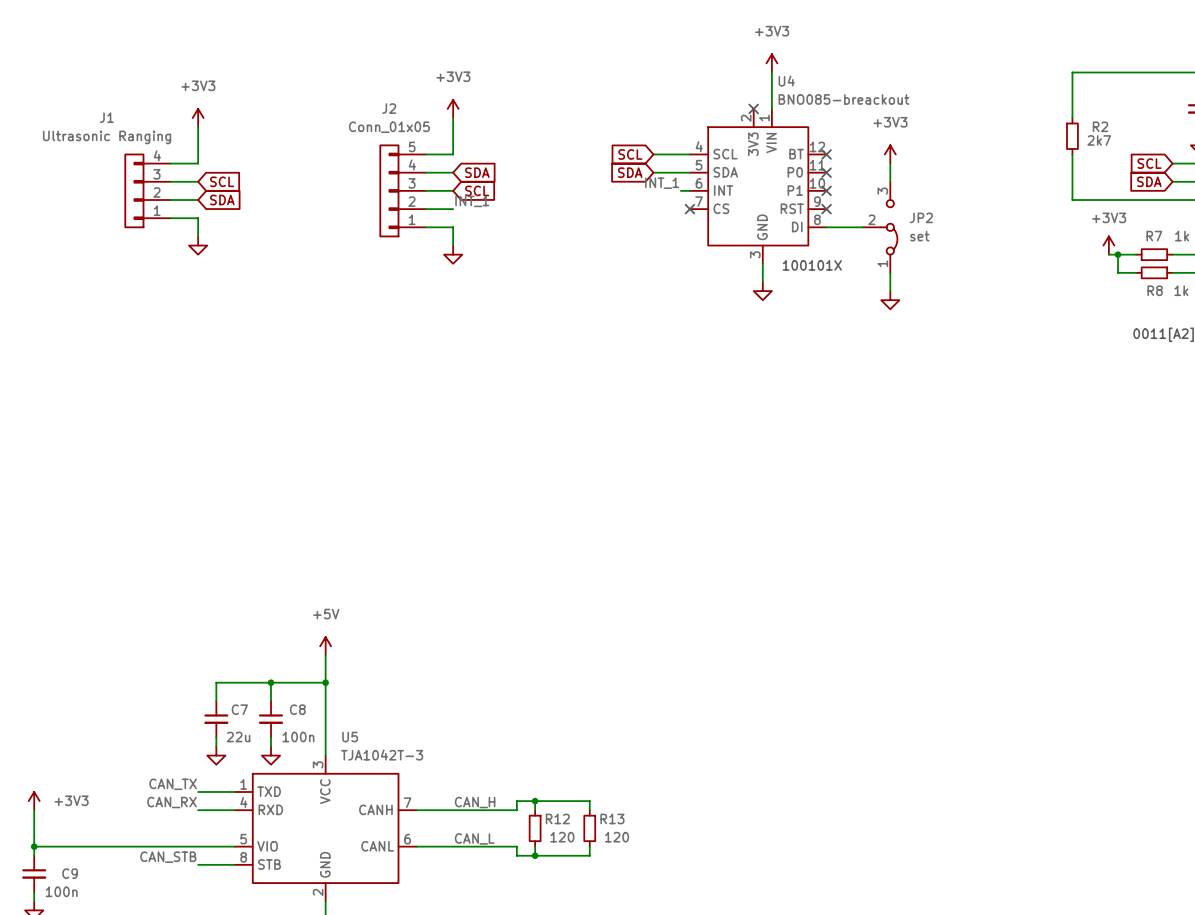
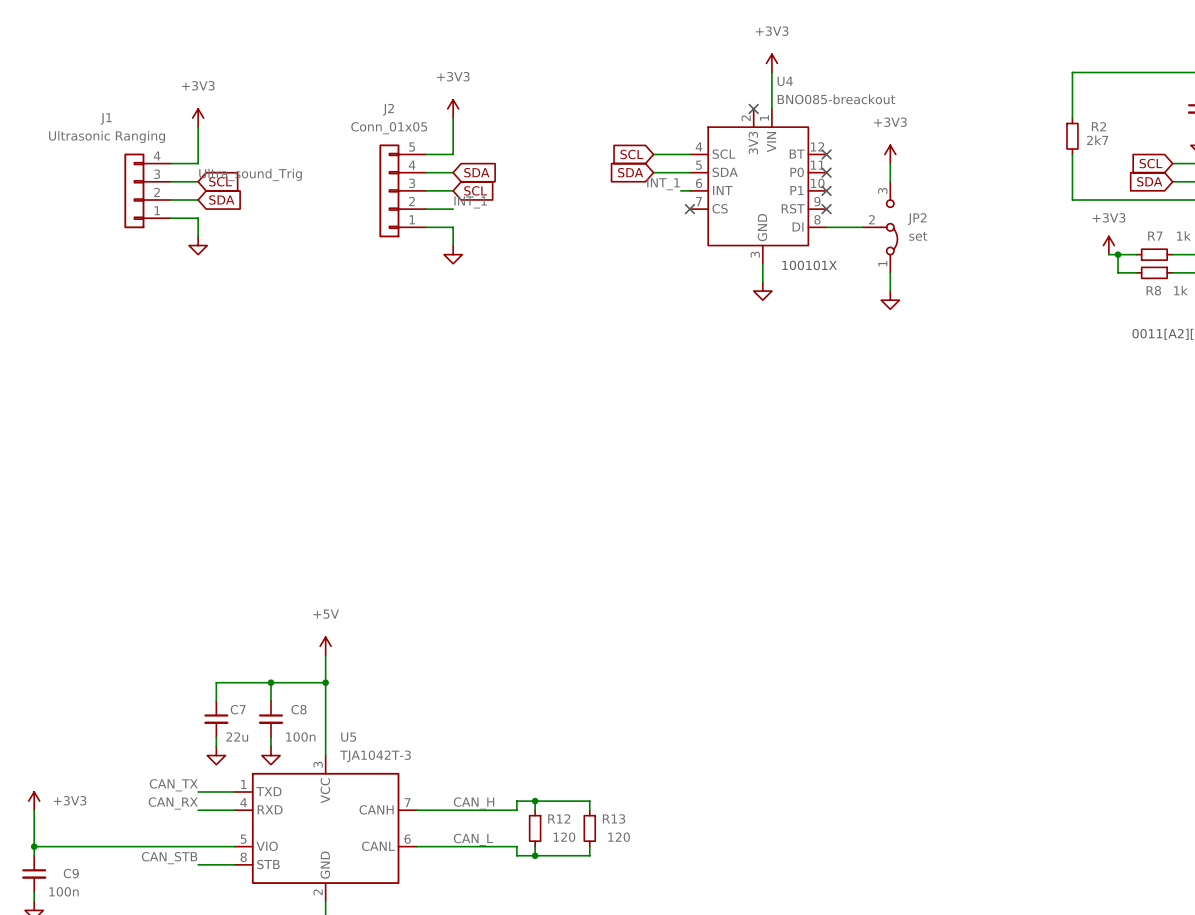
label: none -> Ultra_sound_Trig (250, 174)

